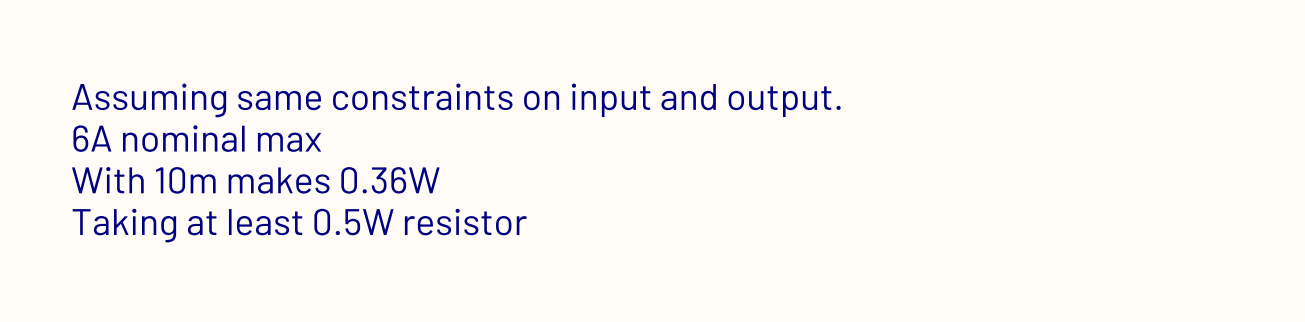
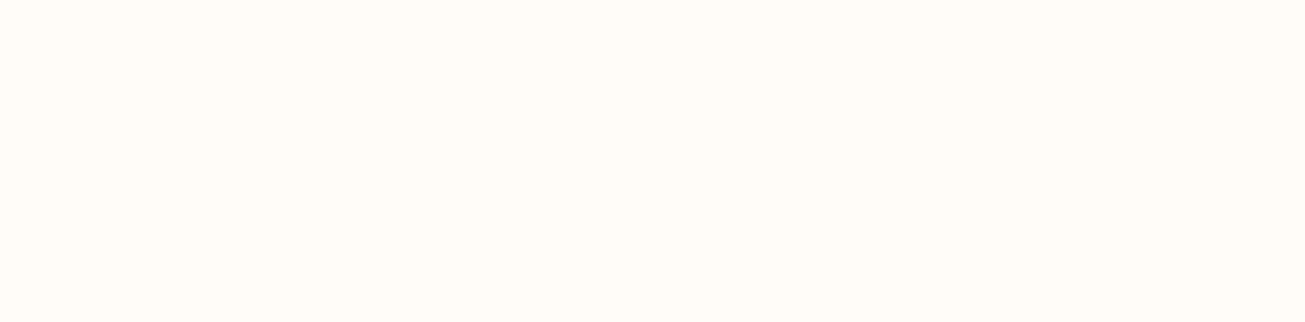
text: Assuming same constraints on input and output. (456, 100) -> none
text: 6A nominal max (197, 138) -> none
text: With 10m makes 0.36W (255, 180) -> none
text: Taking at least 0.5W resistor (299, 225) -> none

